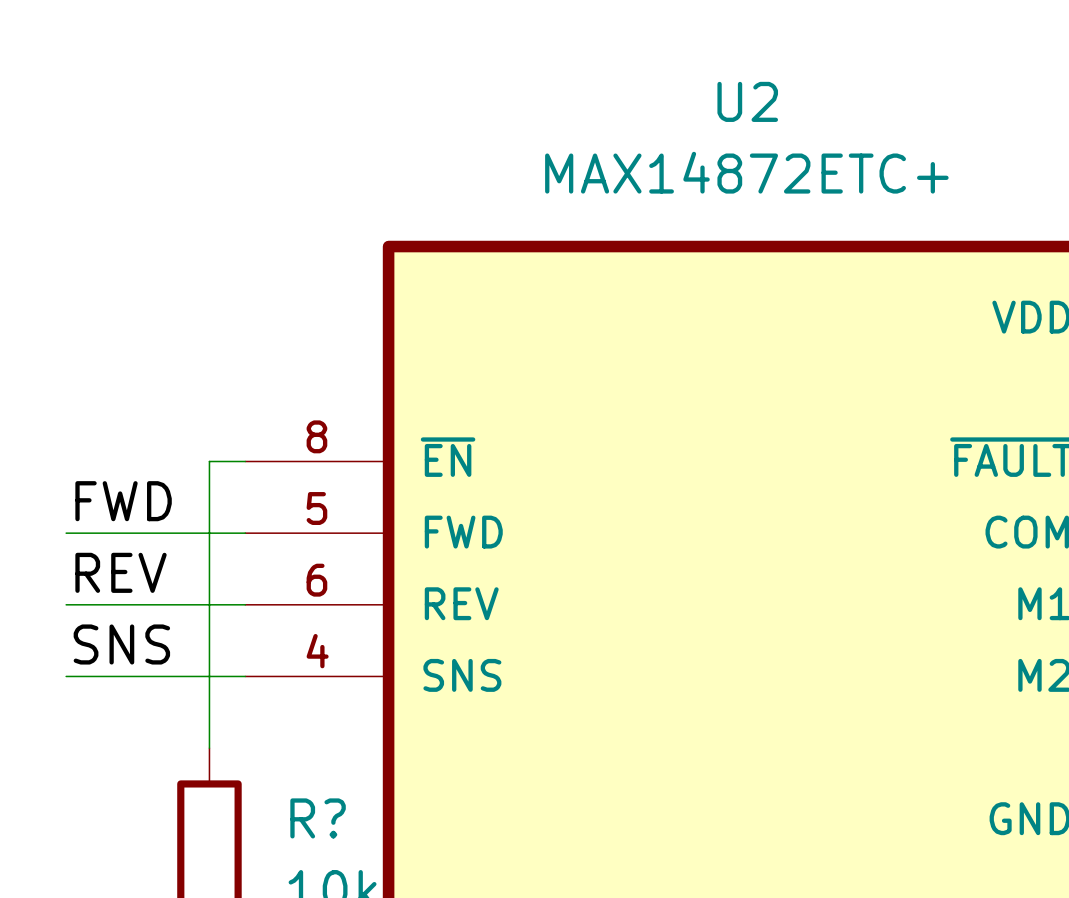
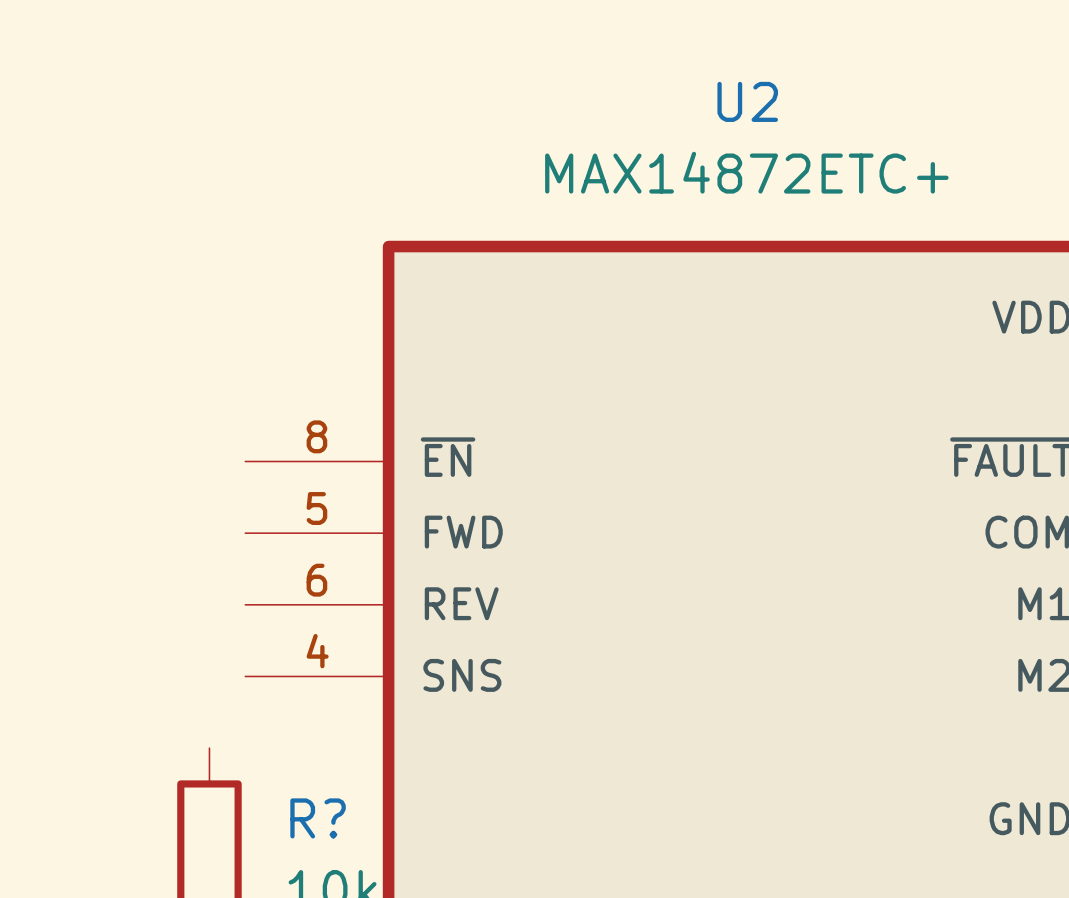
wire: (245, 461) (209, 461) (209, 748) -> none
label: FWD (123, 501) -> none
wire: (66, 533) (245, 533) -> none
label: REV (121, 572) -> none
wire: (66, 604) (245, 604) -> none
label: SNS (121, 644) -> none
wire: (66, 676) (245, 676) -> none

